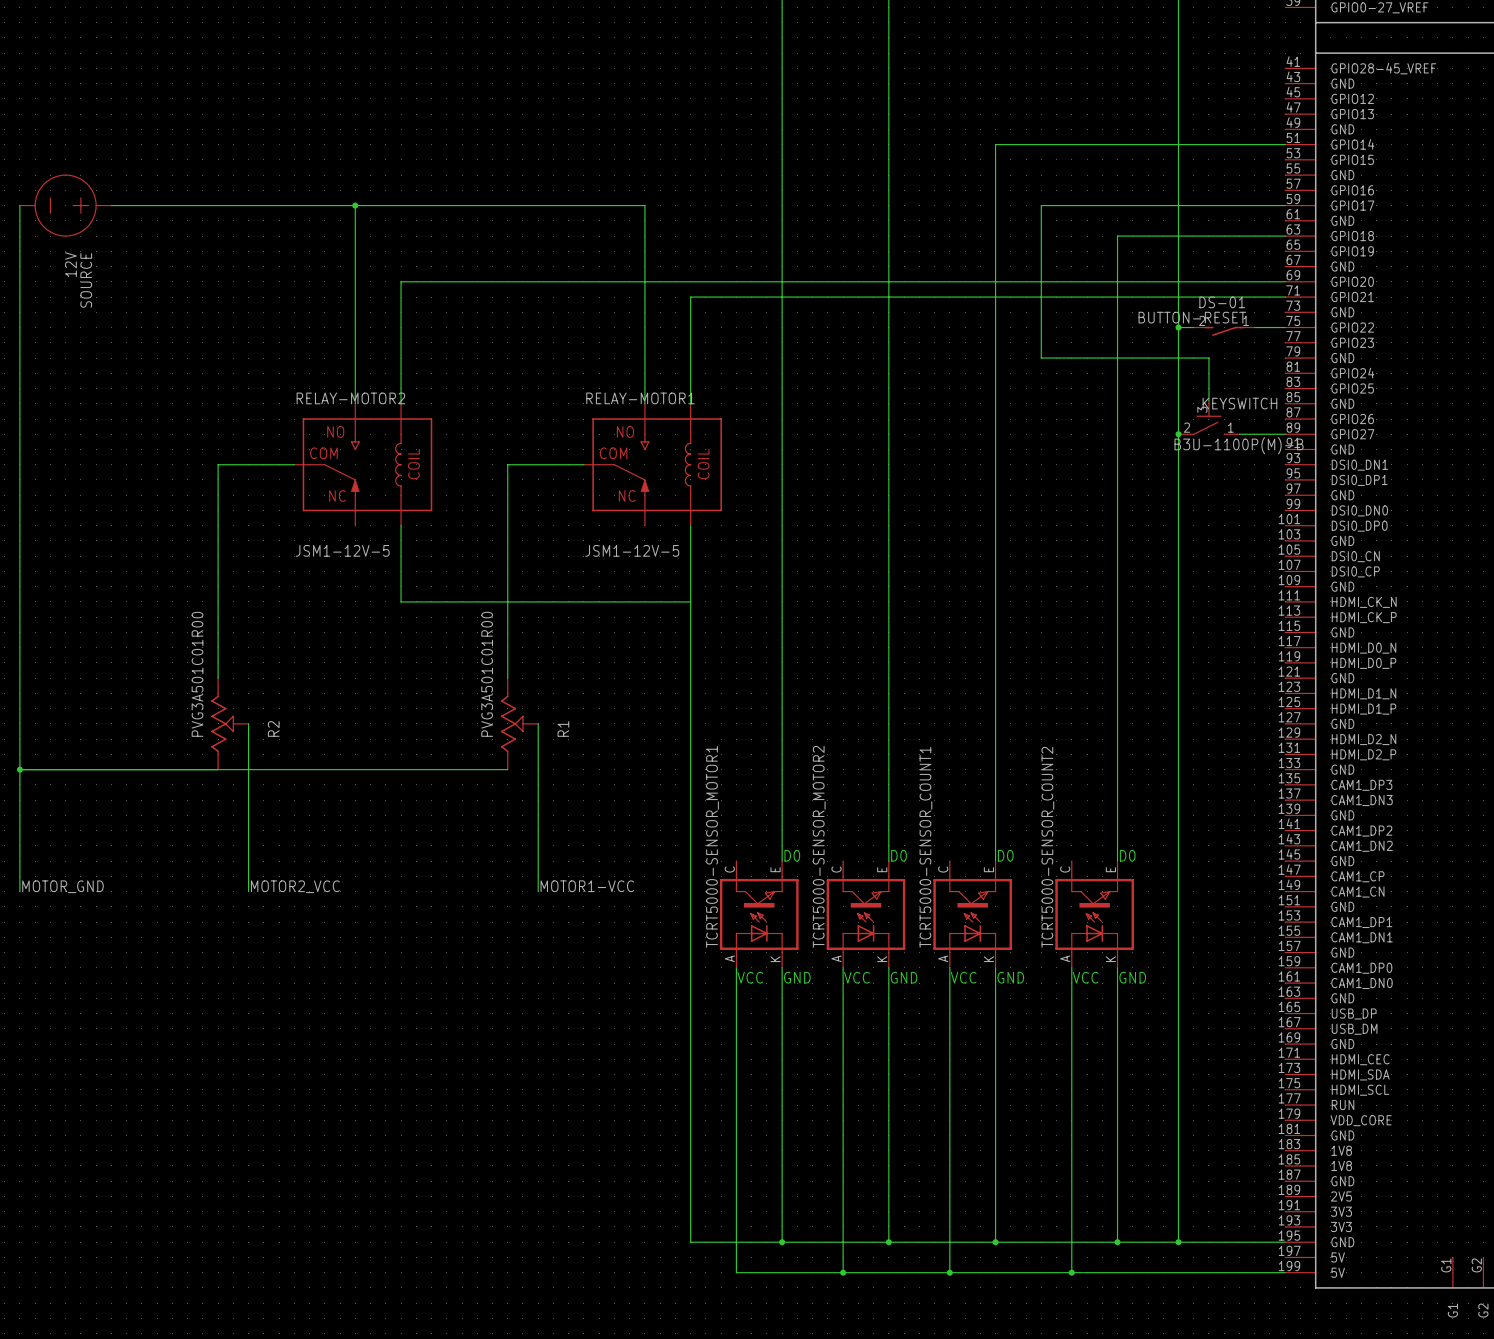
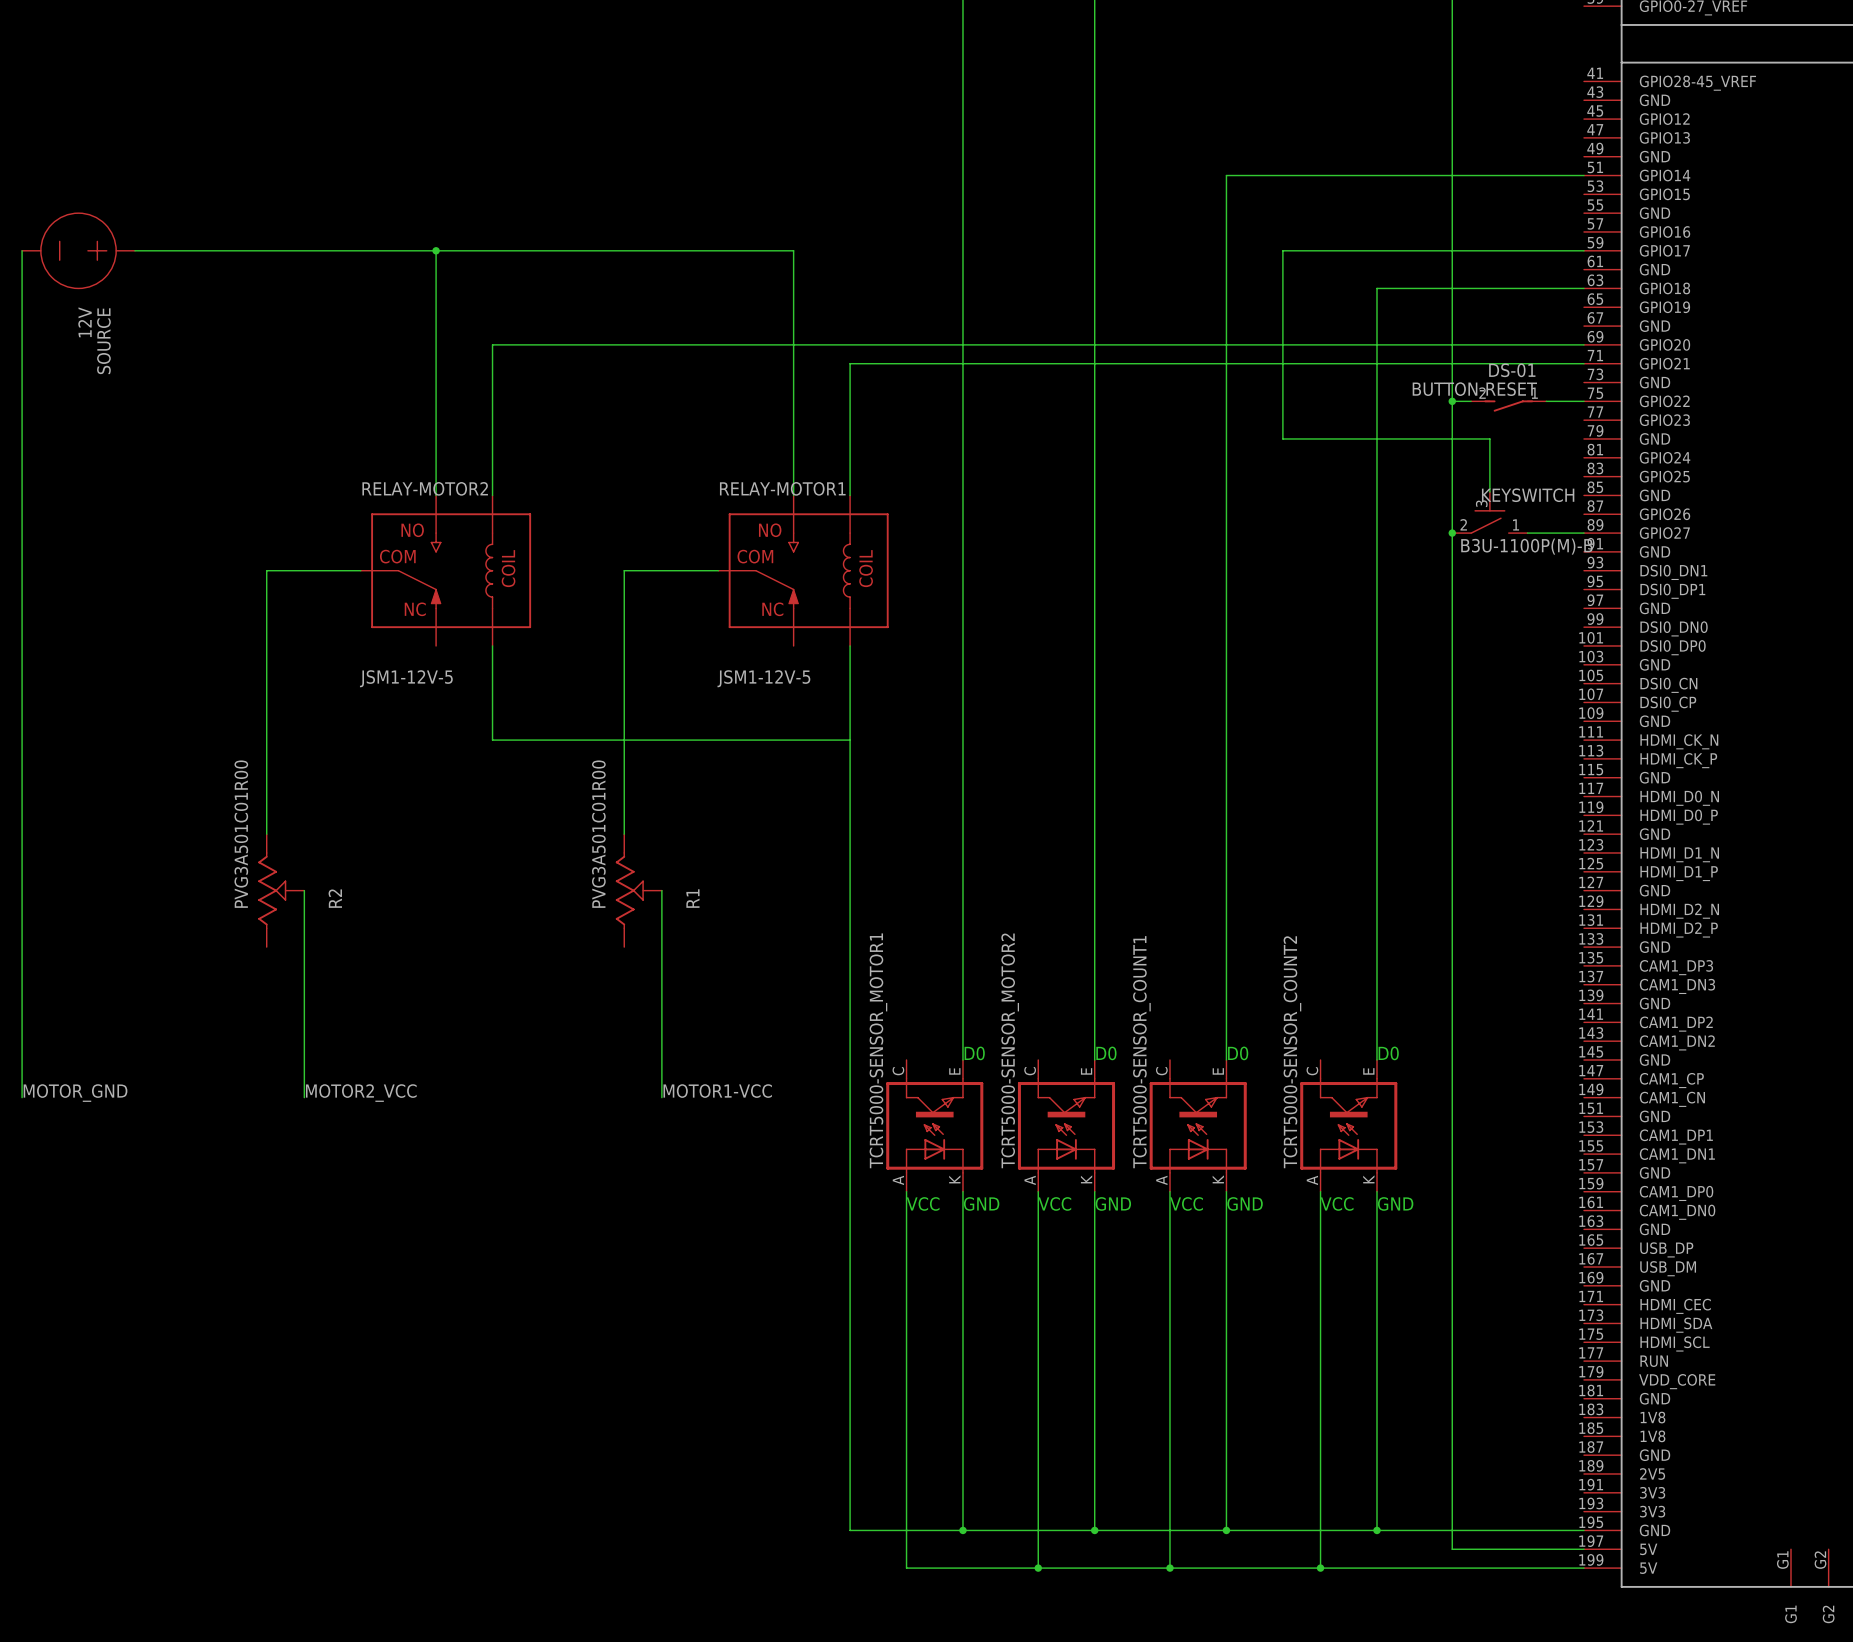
wire: (19, 769) (507, 769) -> none
junction: (19, 769) -> none
wire: none -> (1452, 1530) (1452, 1549) (1583, 1549)
junction: (1178, 1242) -> none

